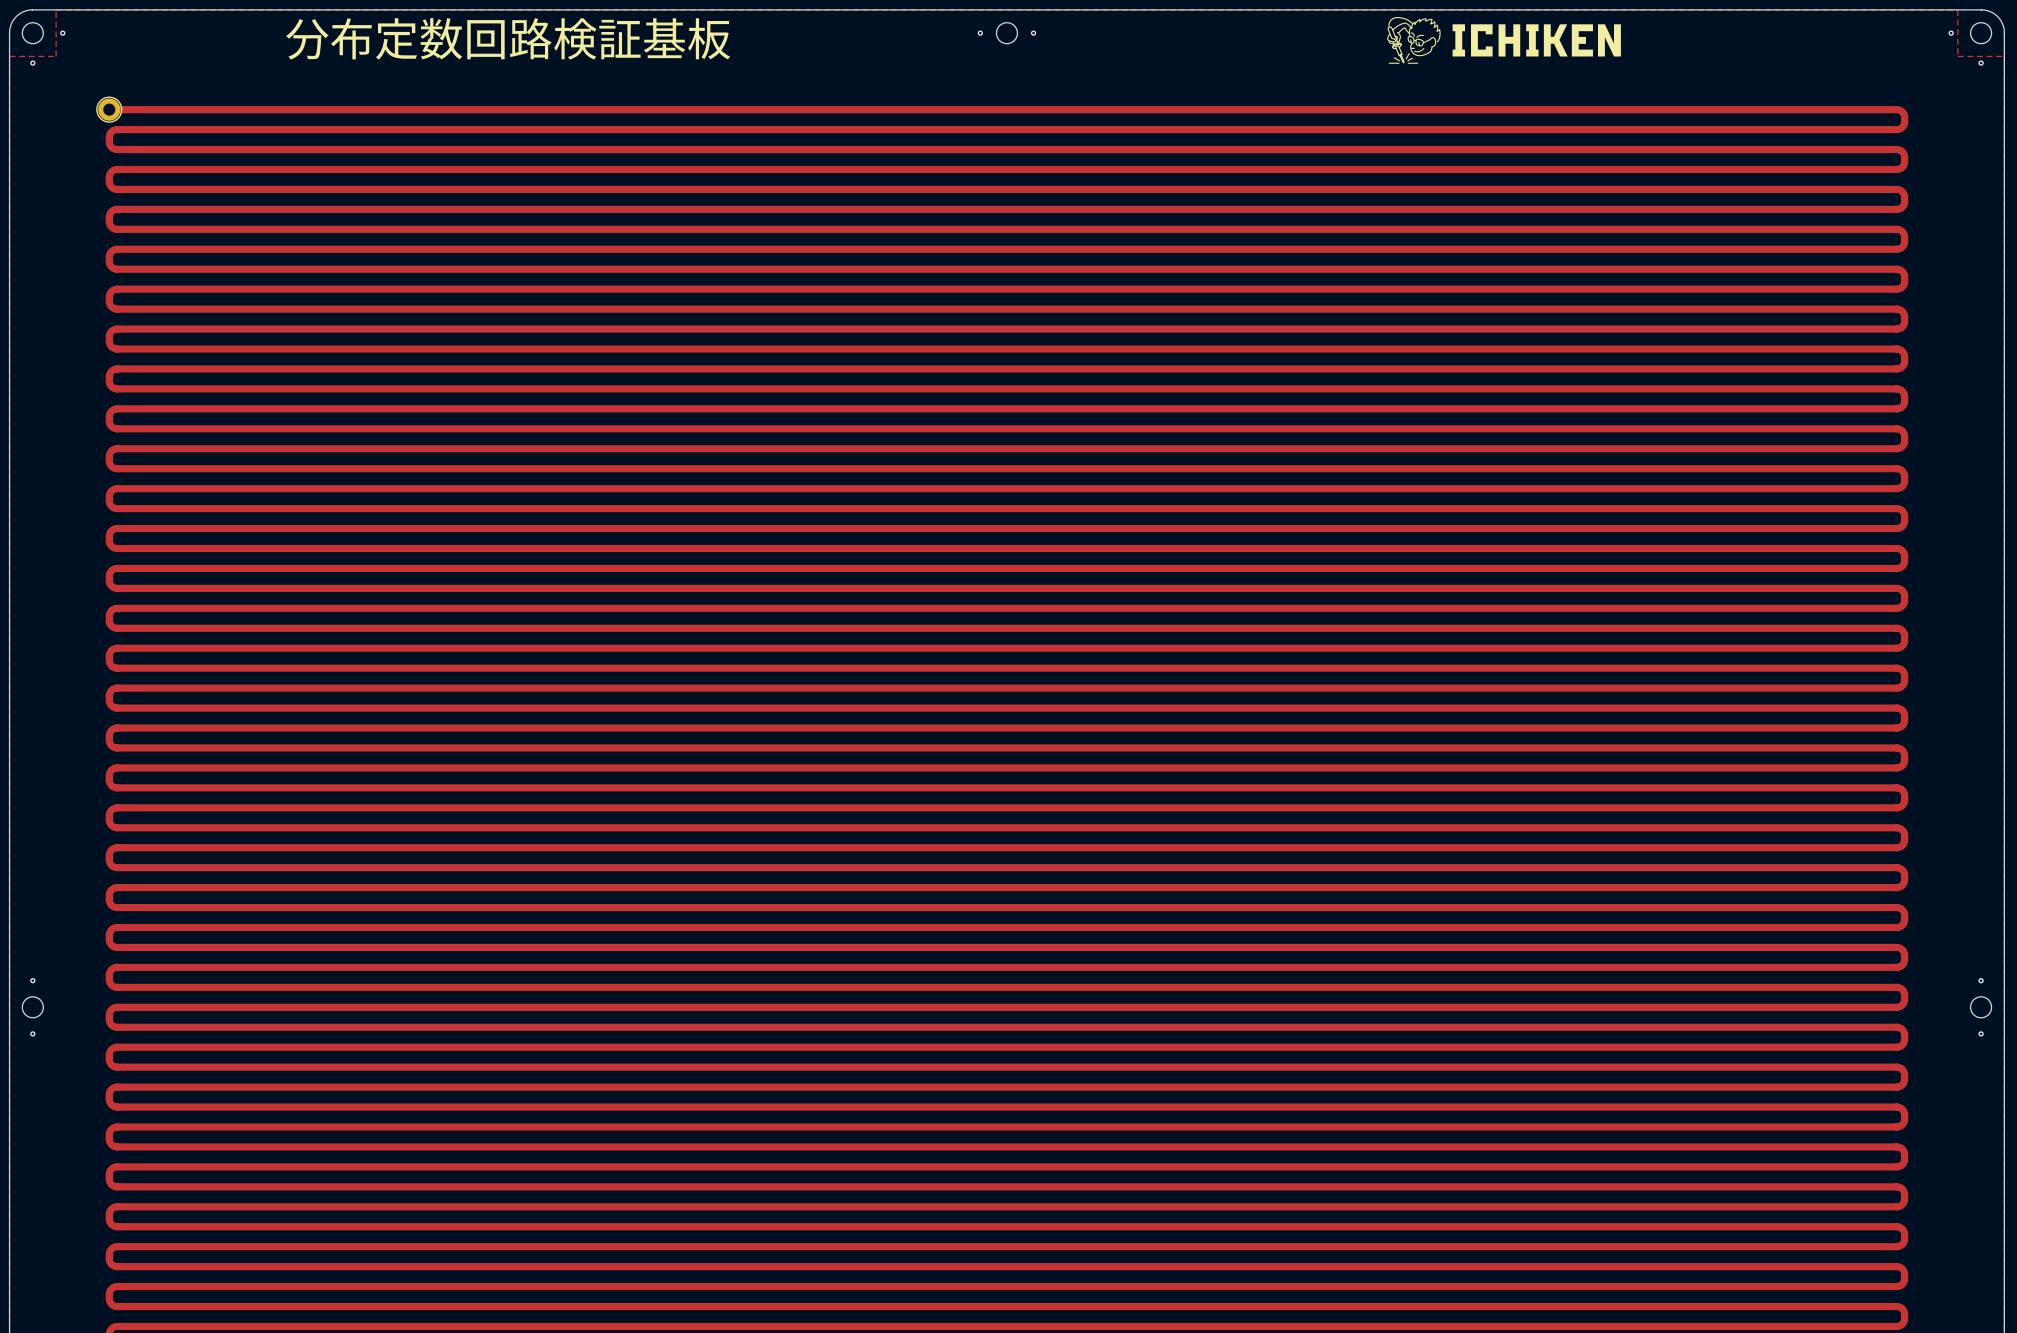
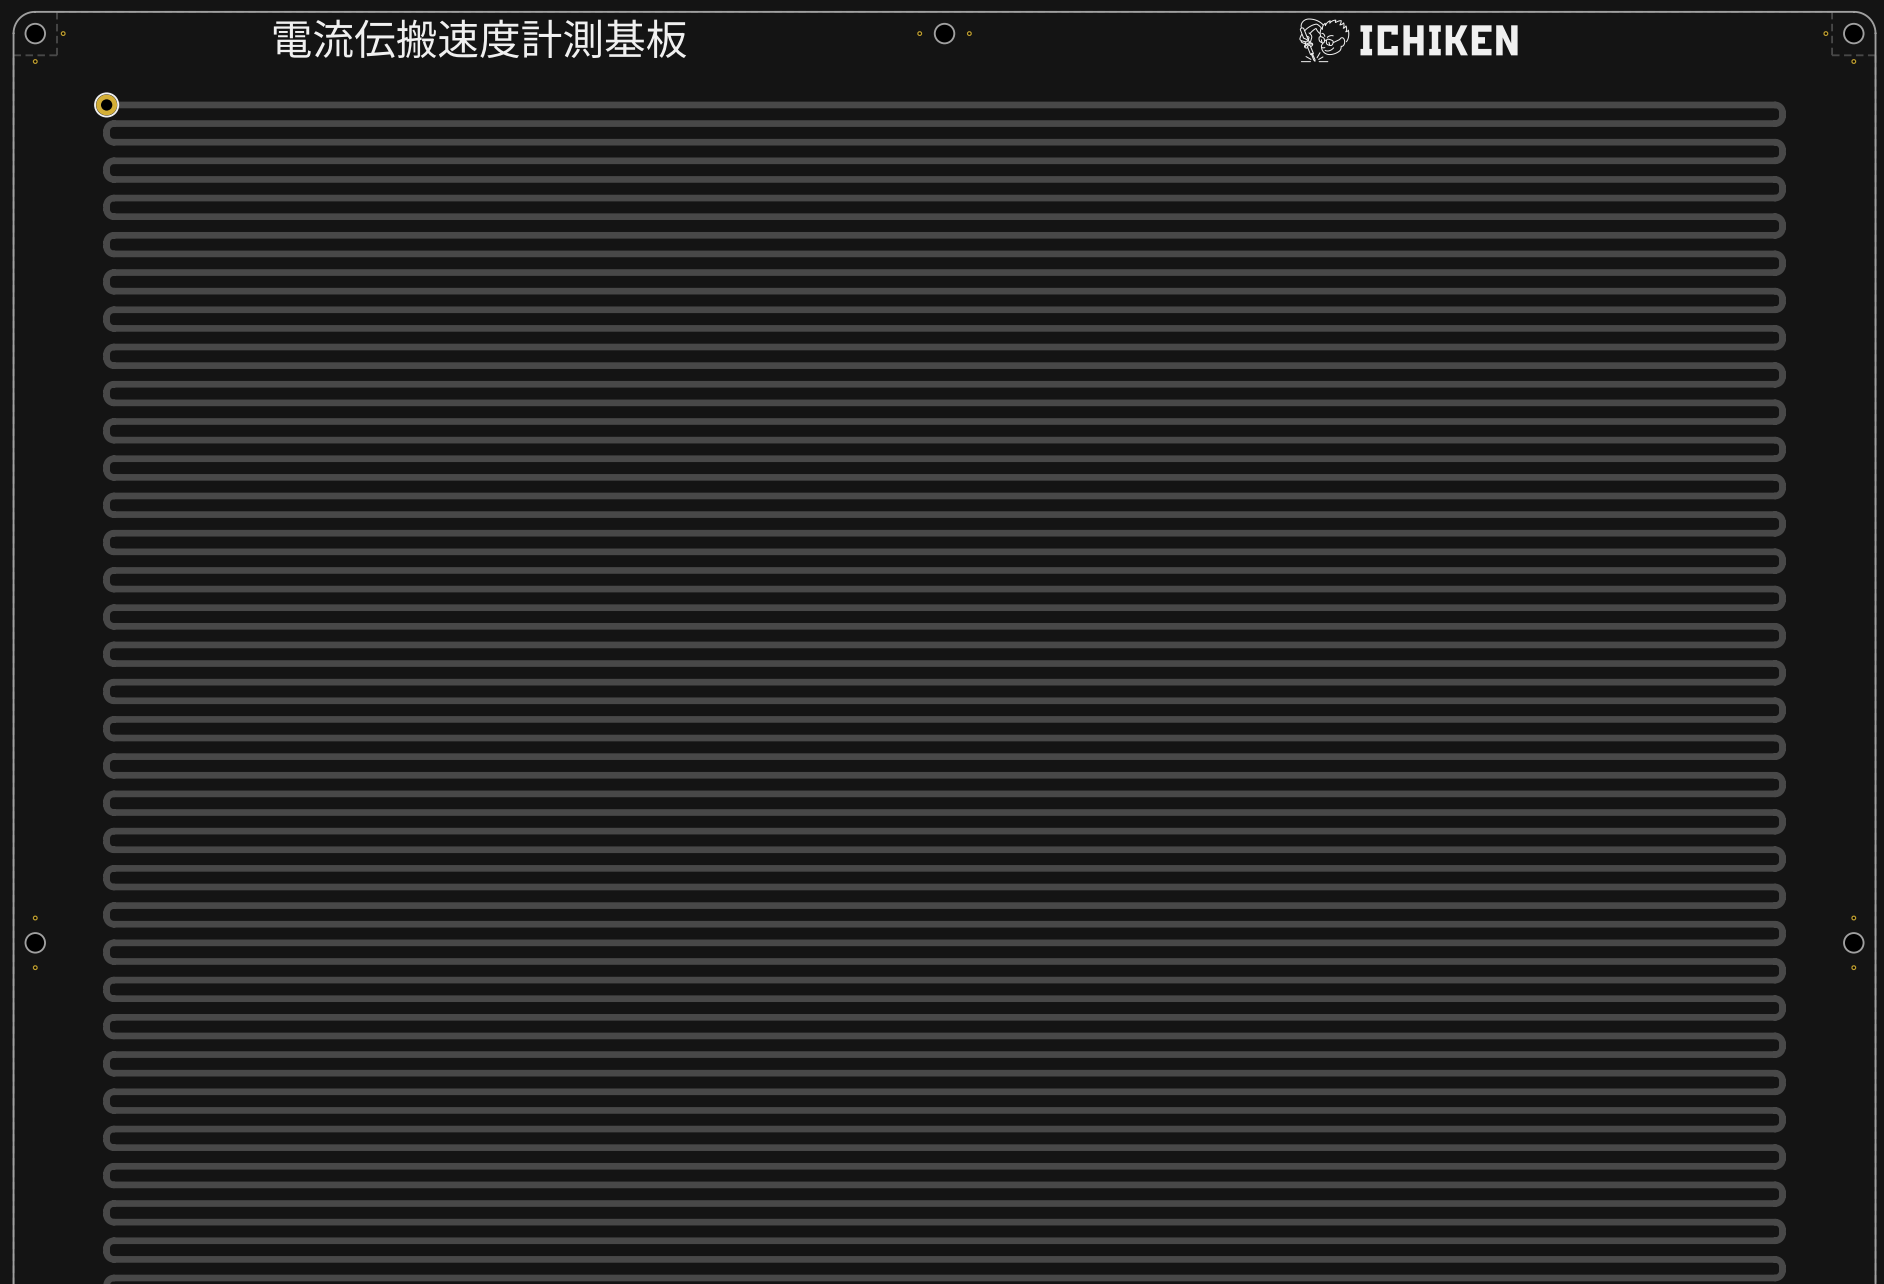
text: 分布定数回路検証基板 (508, 38) -> 電流伝搬速度計測基板 (480, 38)

